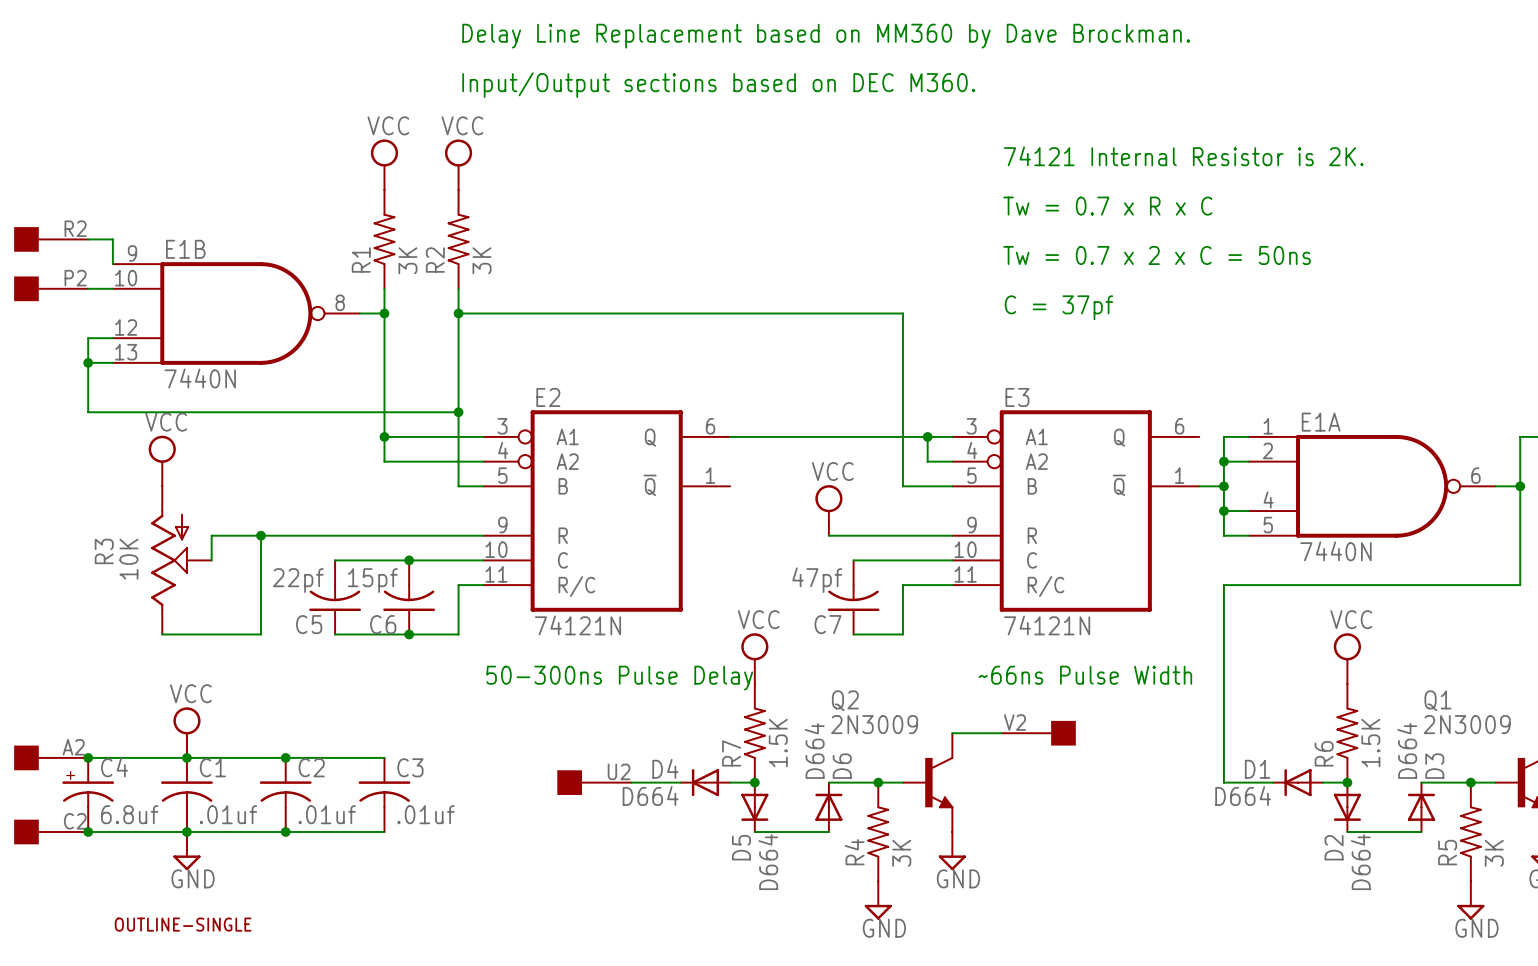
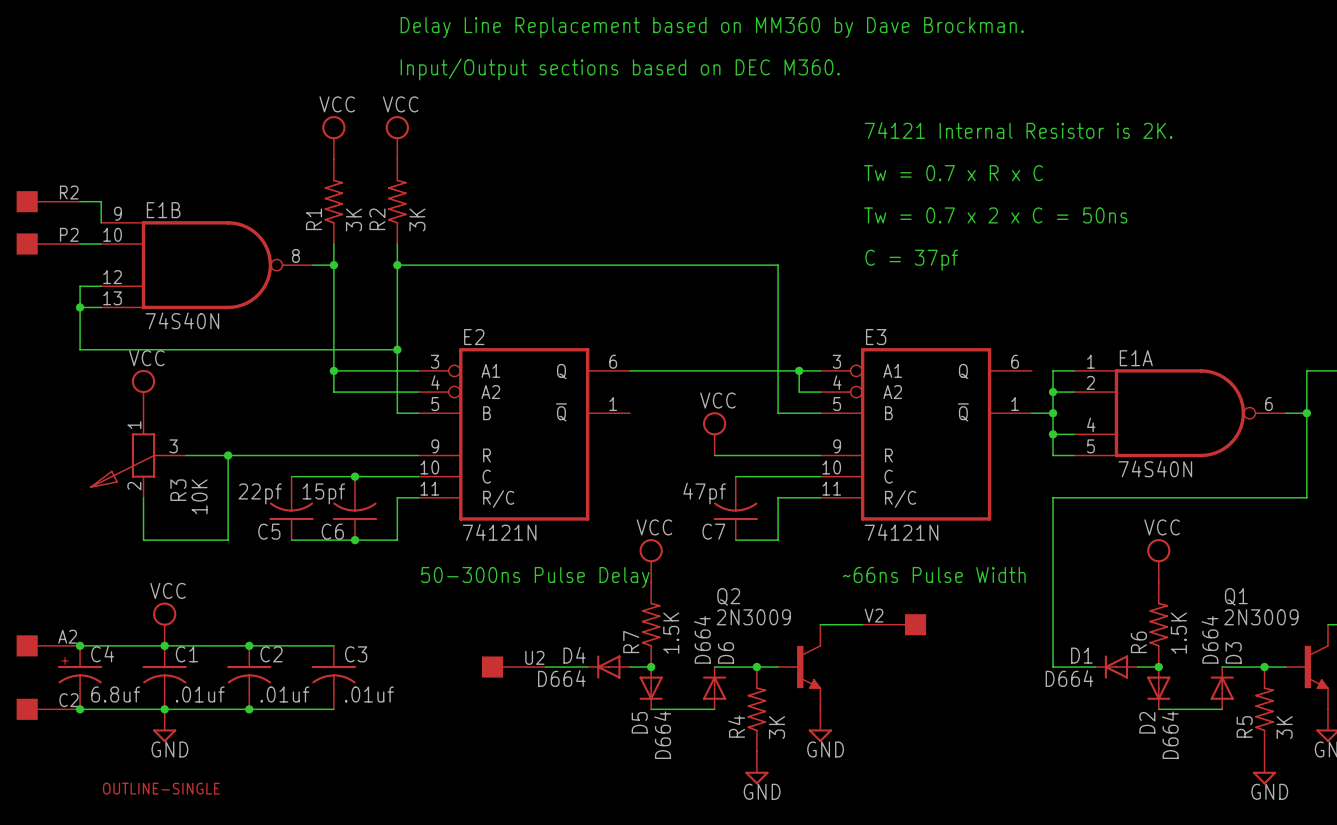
E1B value: 7440N (200, 378) -> 74S40N (182, 320)
R3 symbol: [151, 486, 212, 635] -> [90, 413, 186, 498]
wire: (211, 535) (211, 560) -> none
R3 name position: R3 (104, 551) -> R3 (178, 490)
E1A value: 7440N (1335, 551) -> 74S40N (1155, 468)
R3 value position: 10K (128, 559) -> 10K (199, 496)

